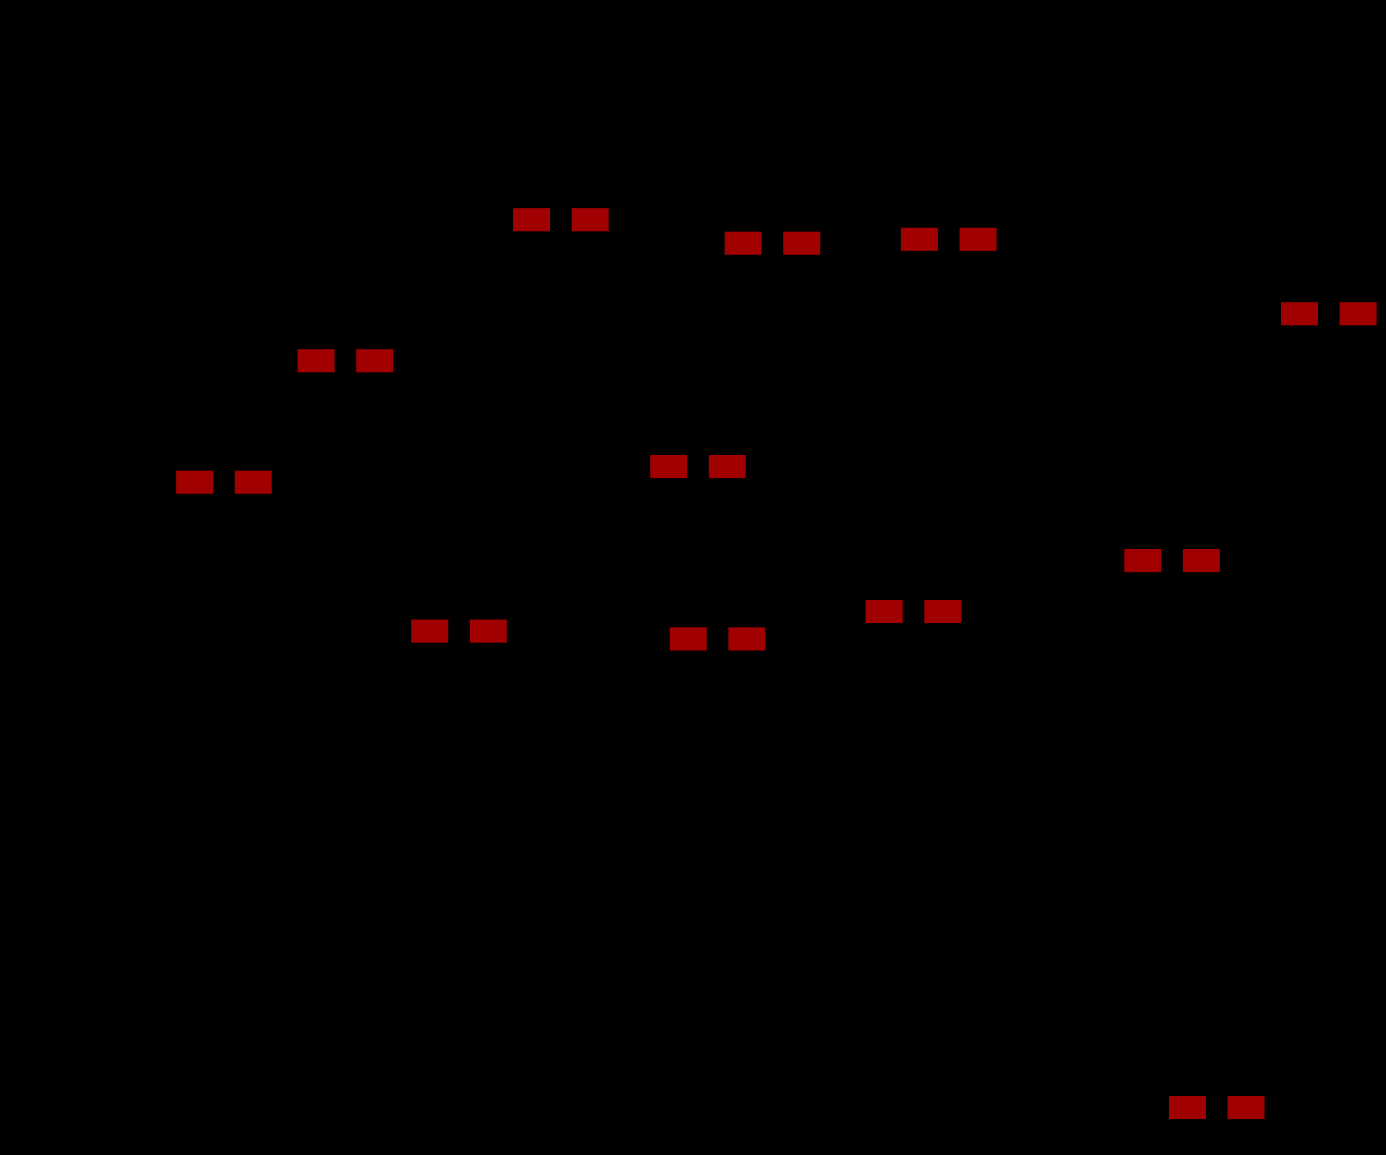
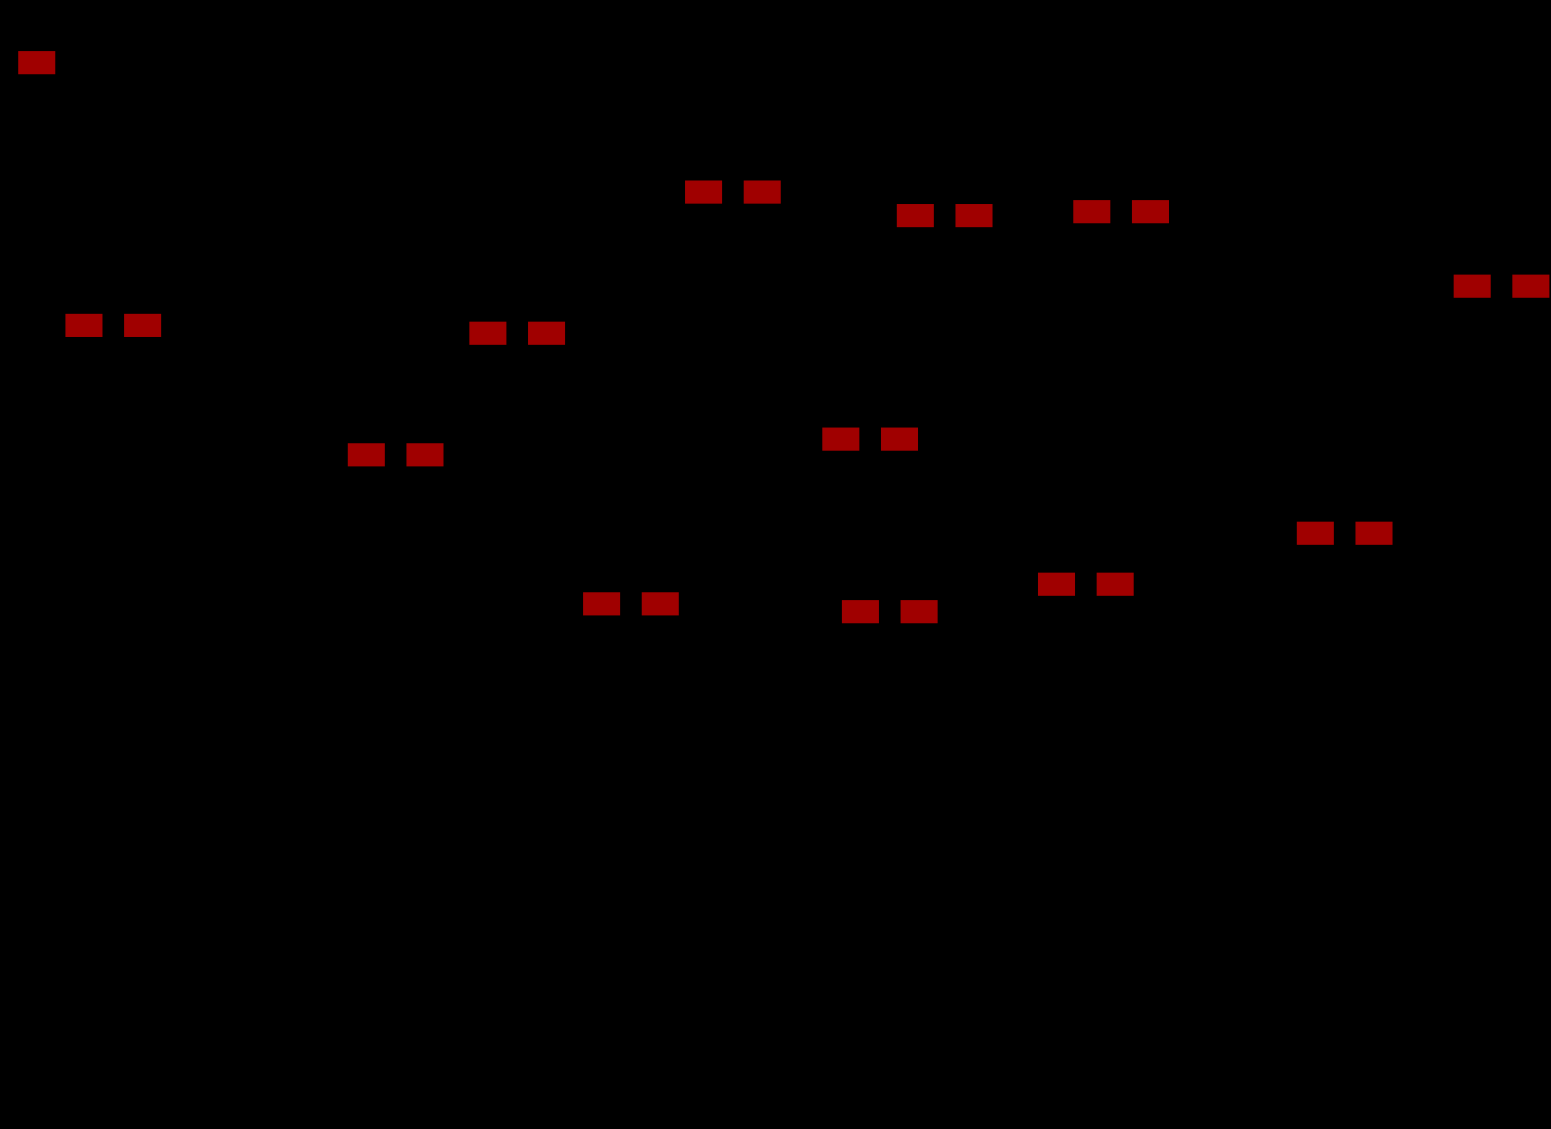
part: (1216, 1107) -> none

